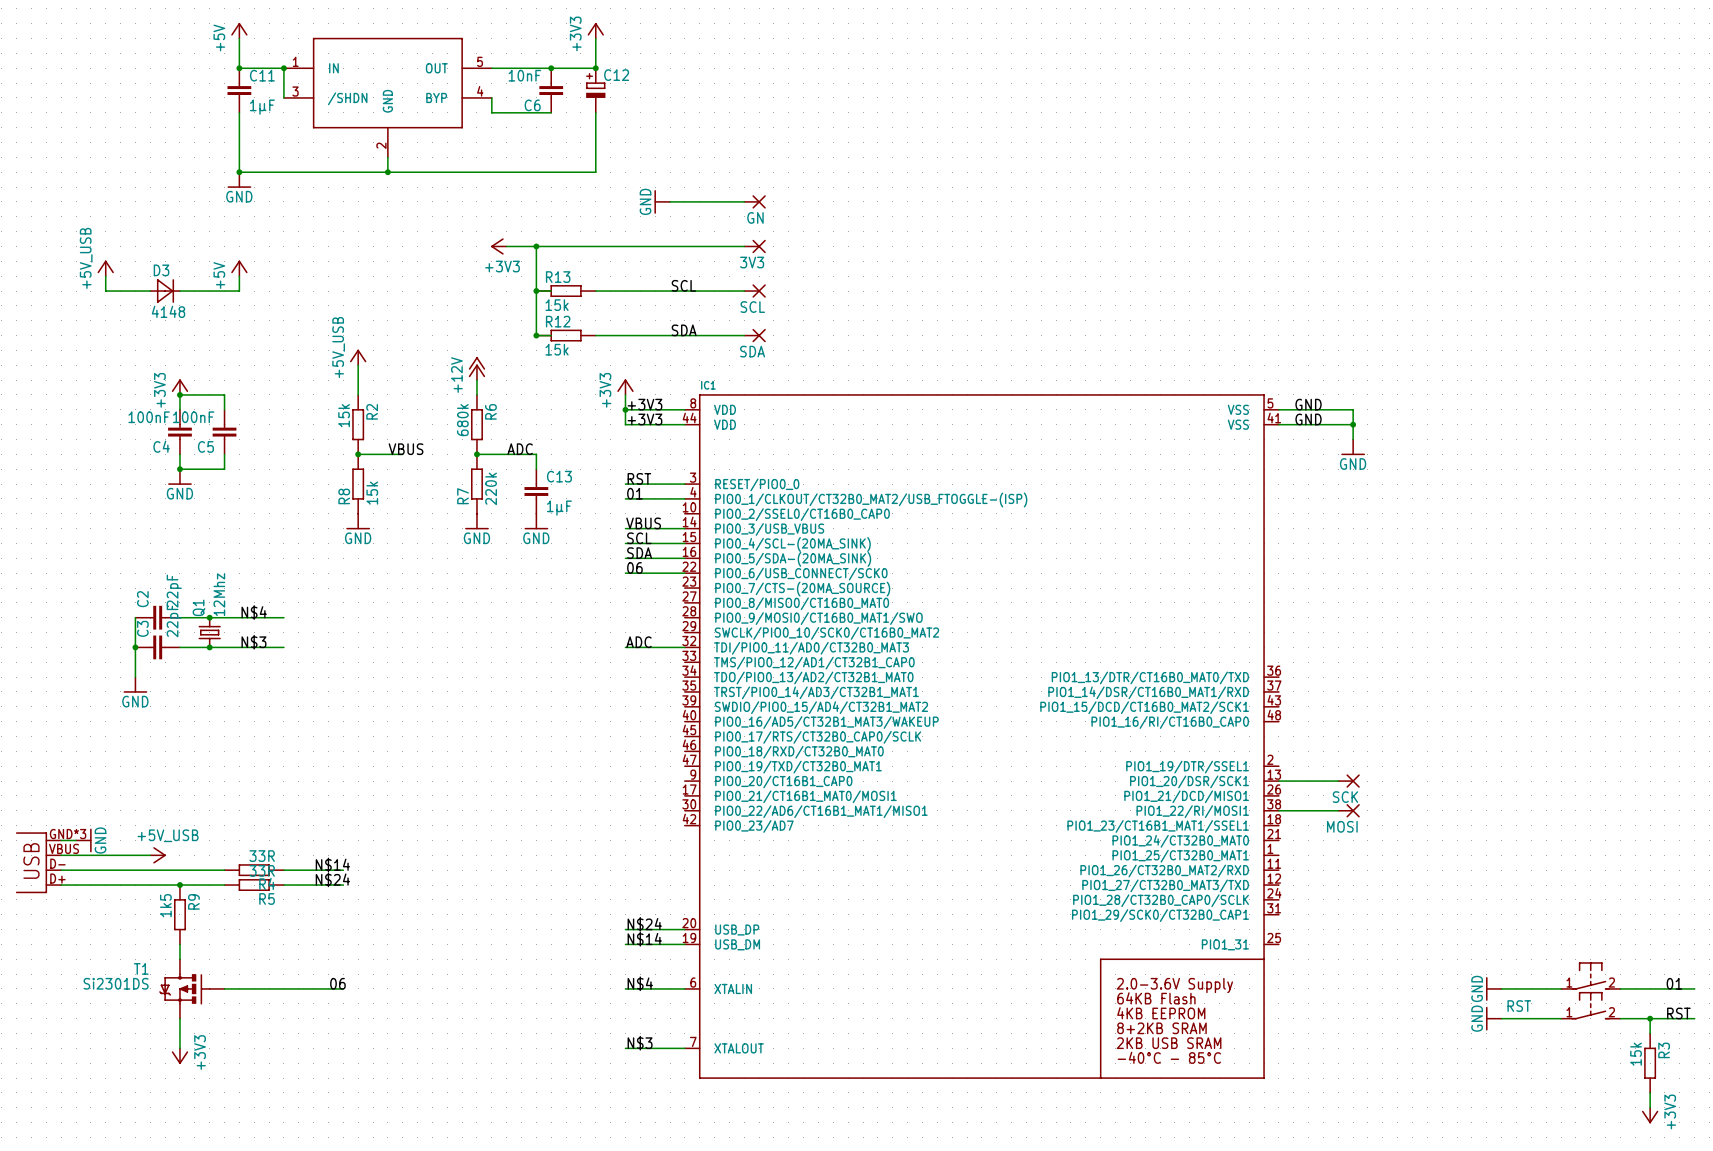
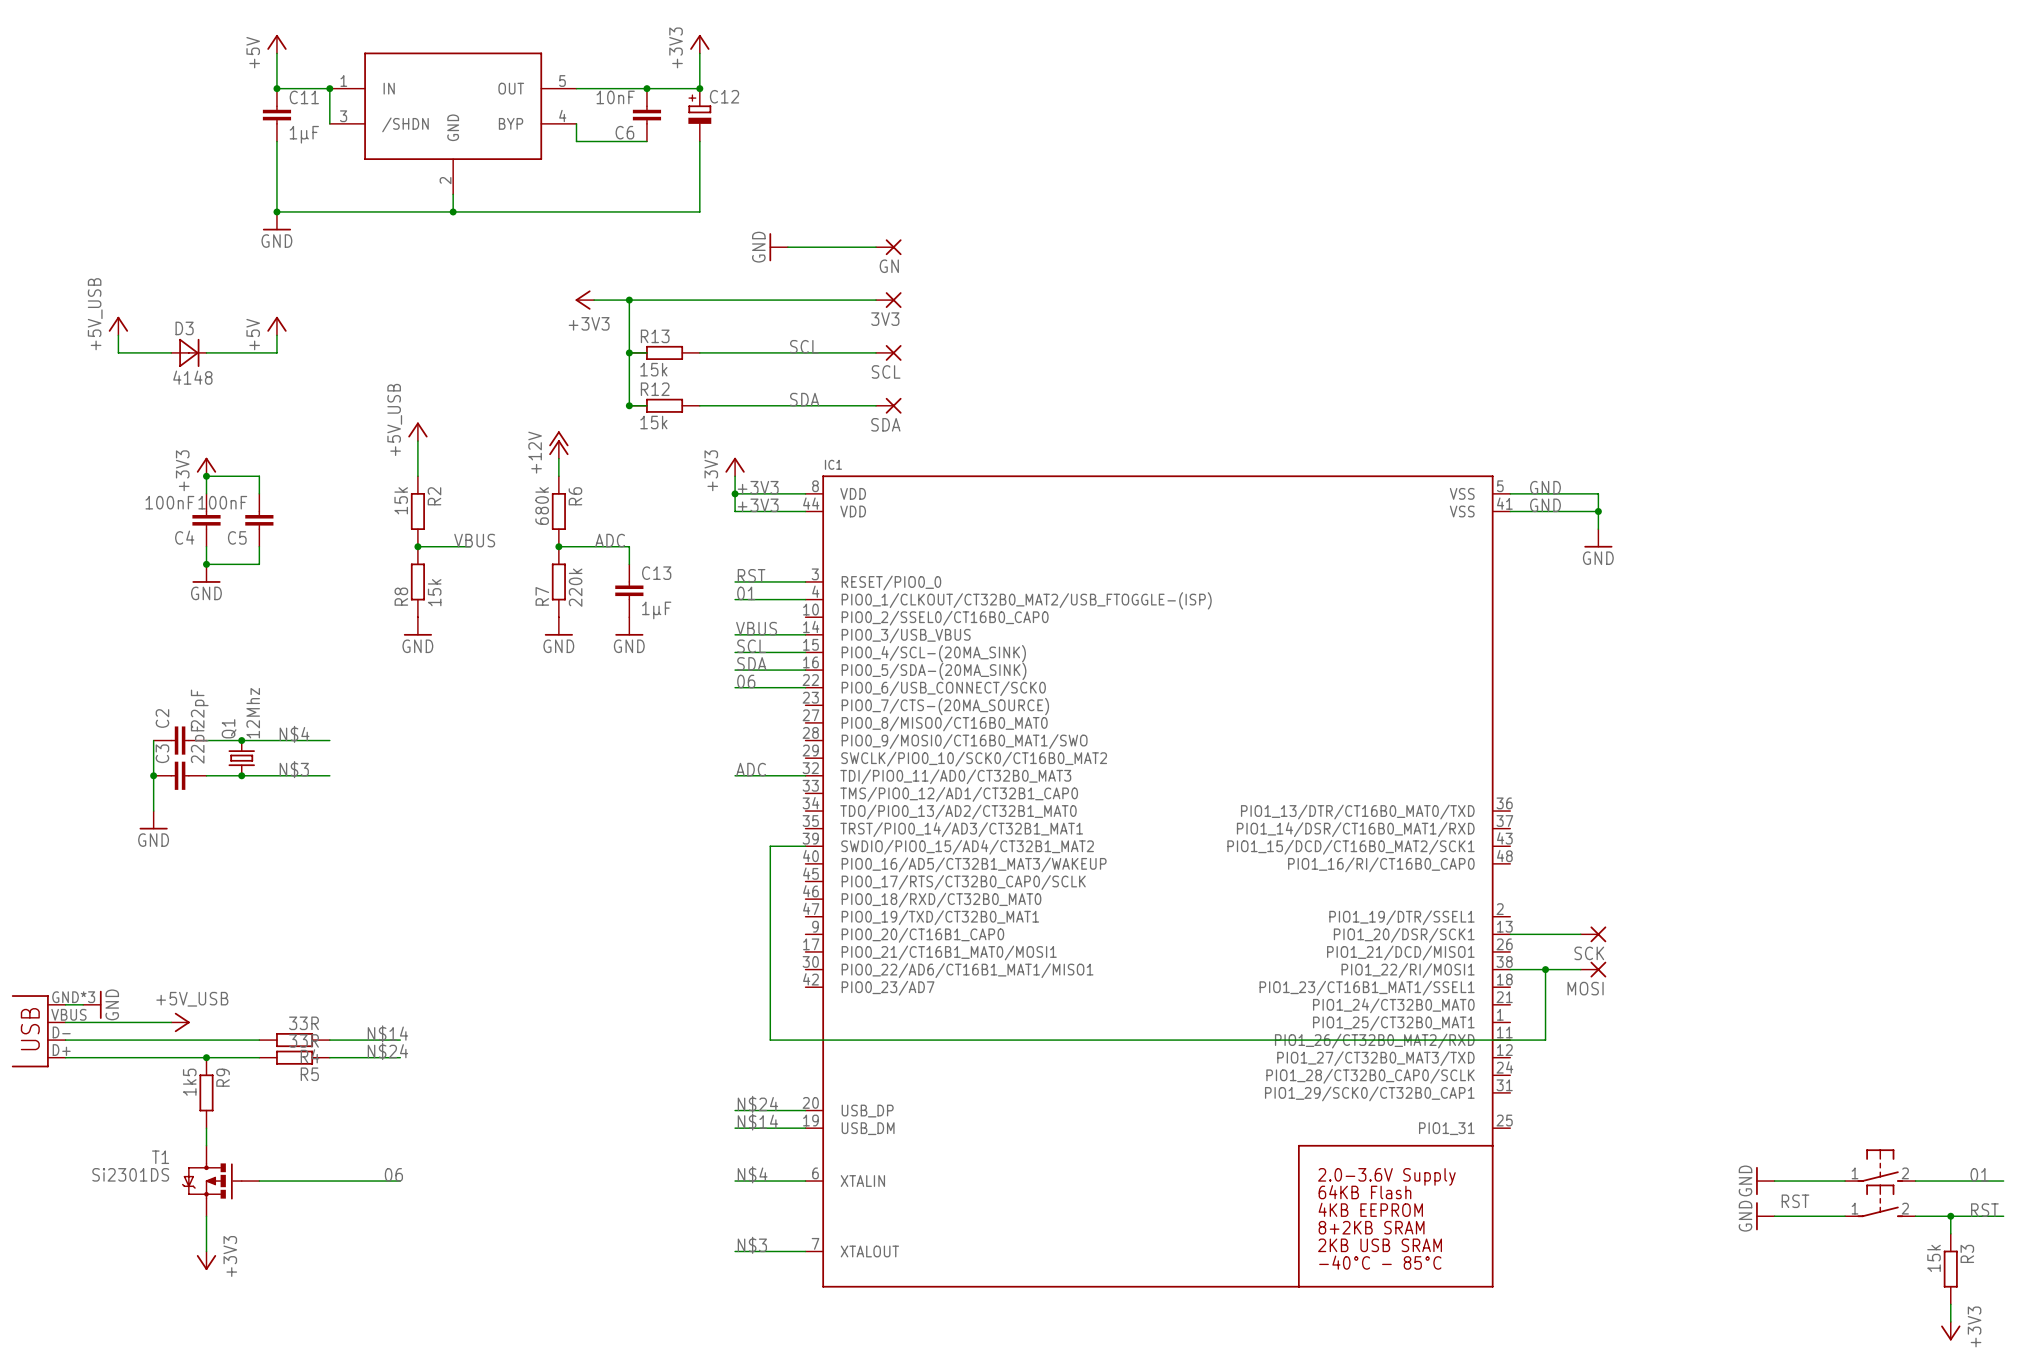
wire: none -> (805, 846) (770, 846) (770, 1040) (1545, 1040) (1545, 969)
junction: none -> (1545, 969)

